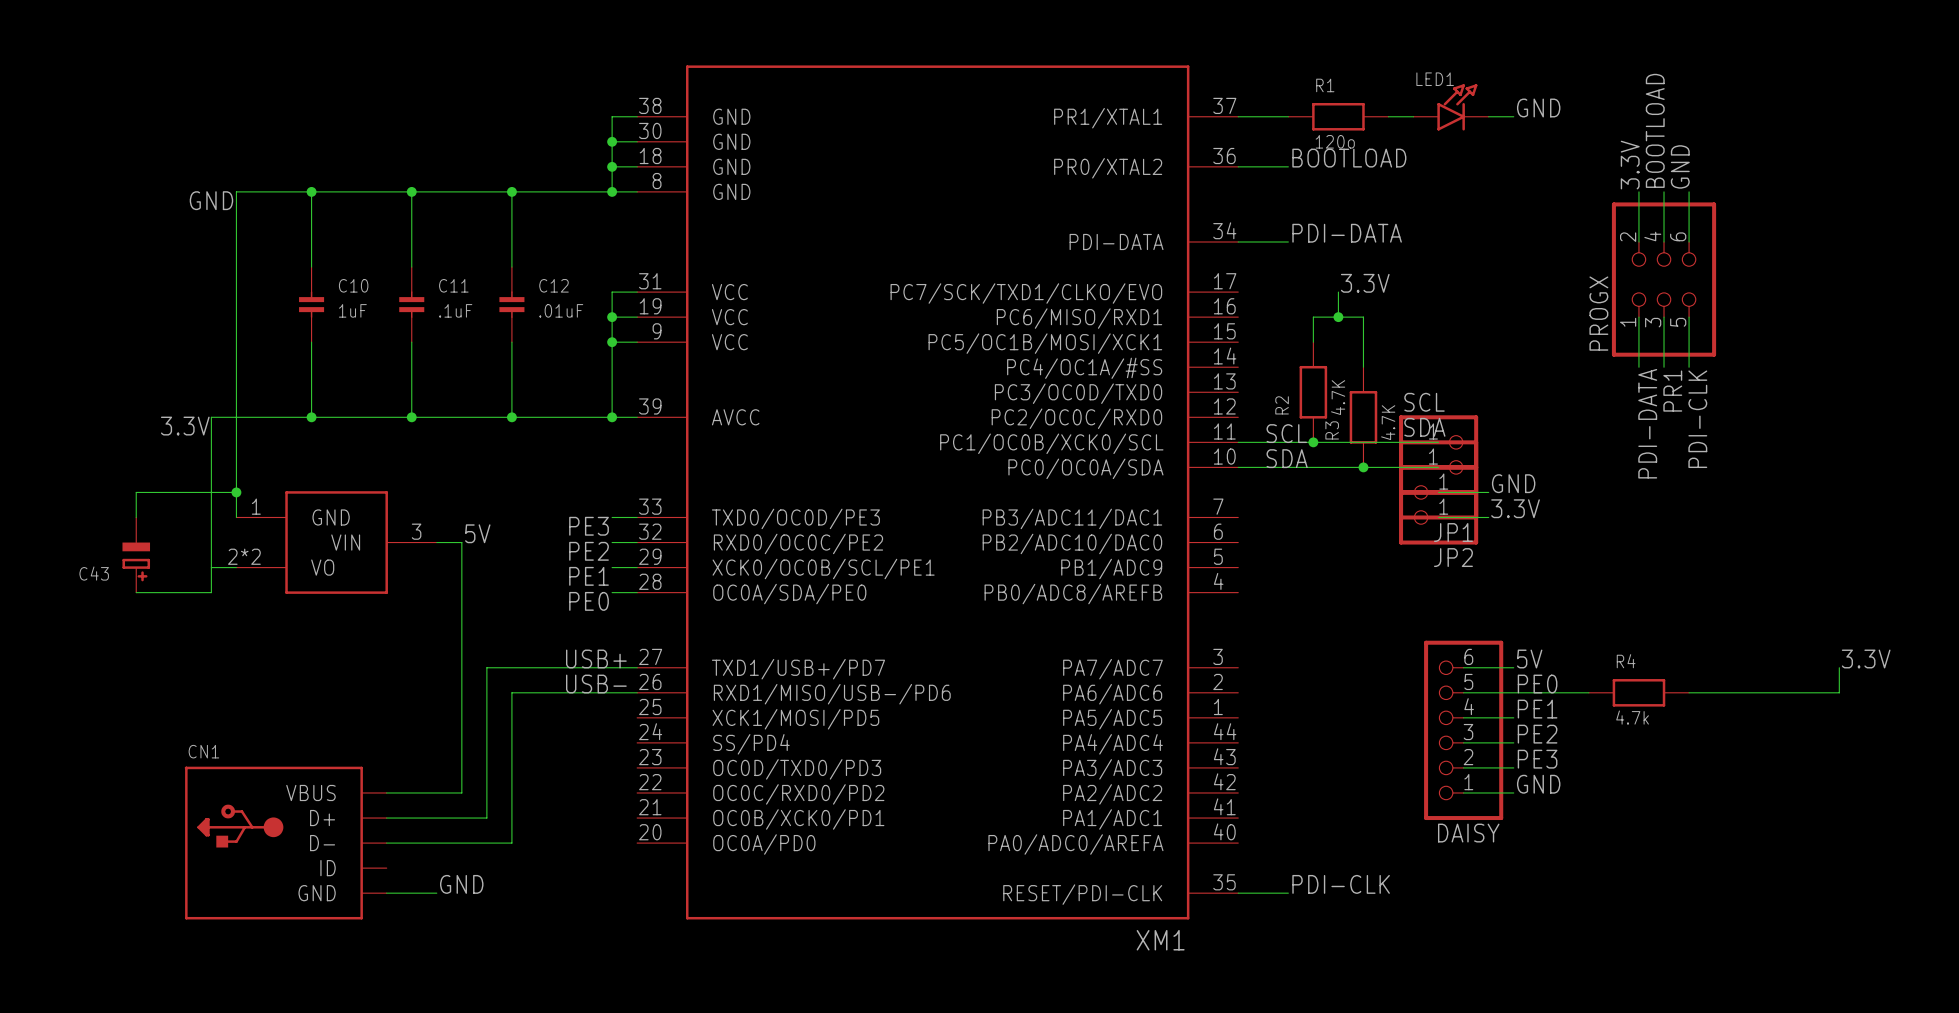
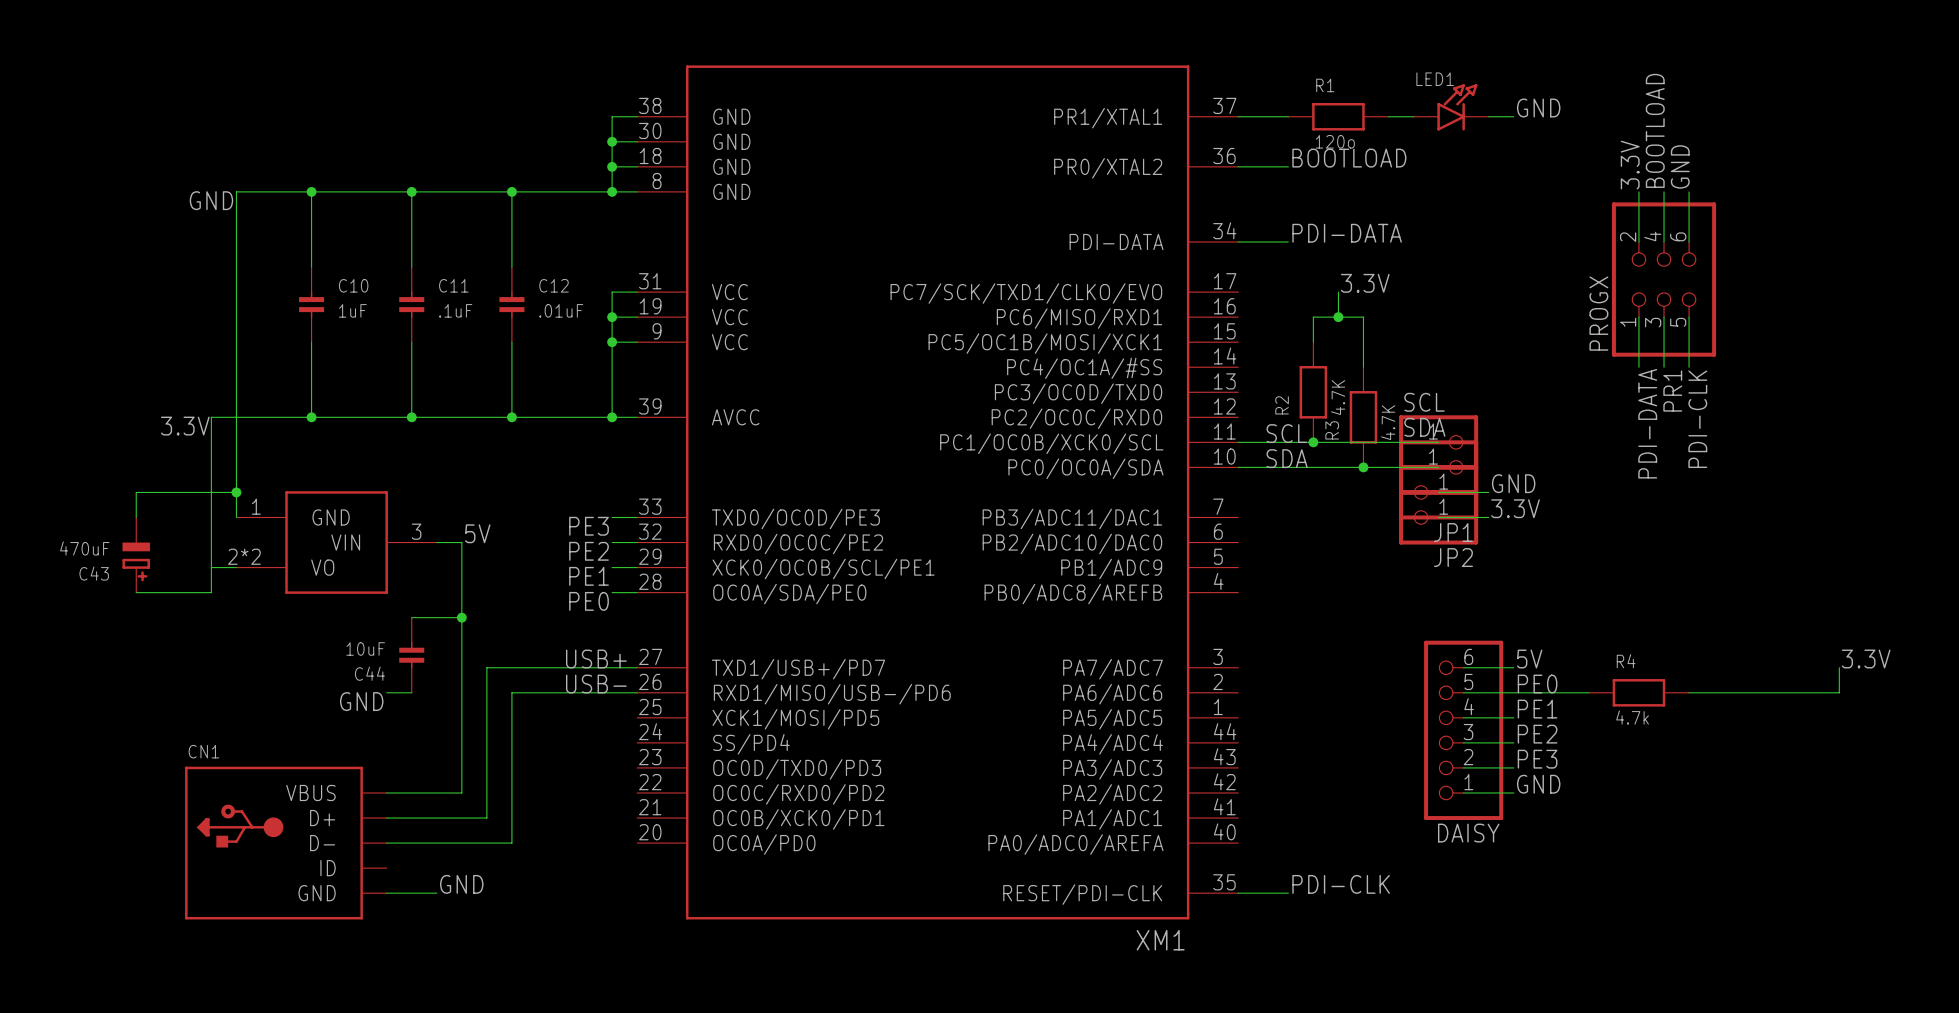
C43 value: none -> 470uF (84, 548)
wire: none -> (411, 617) (461, 617)
junction: none -> (461, 617)
C44: none -> 10uF (411, 655)
wire: none -> (386, 692) (411, 692)
label: none -> GND (361, 701)

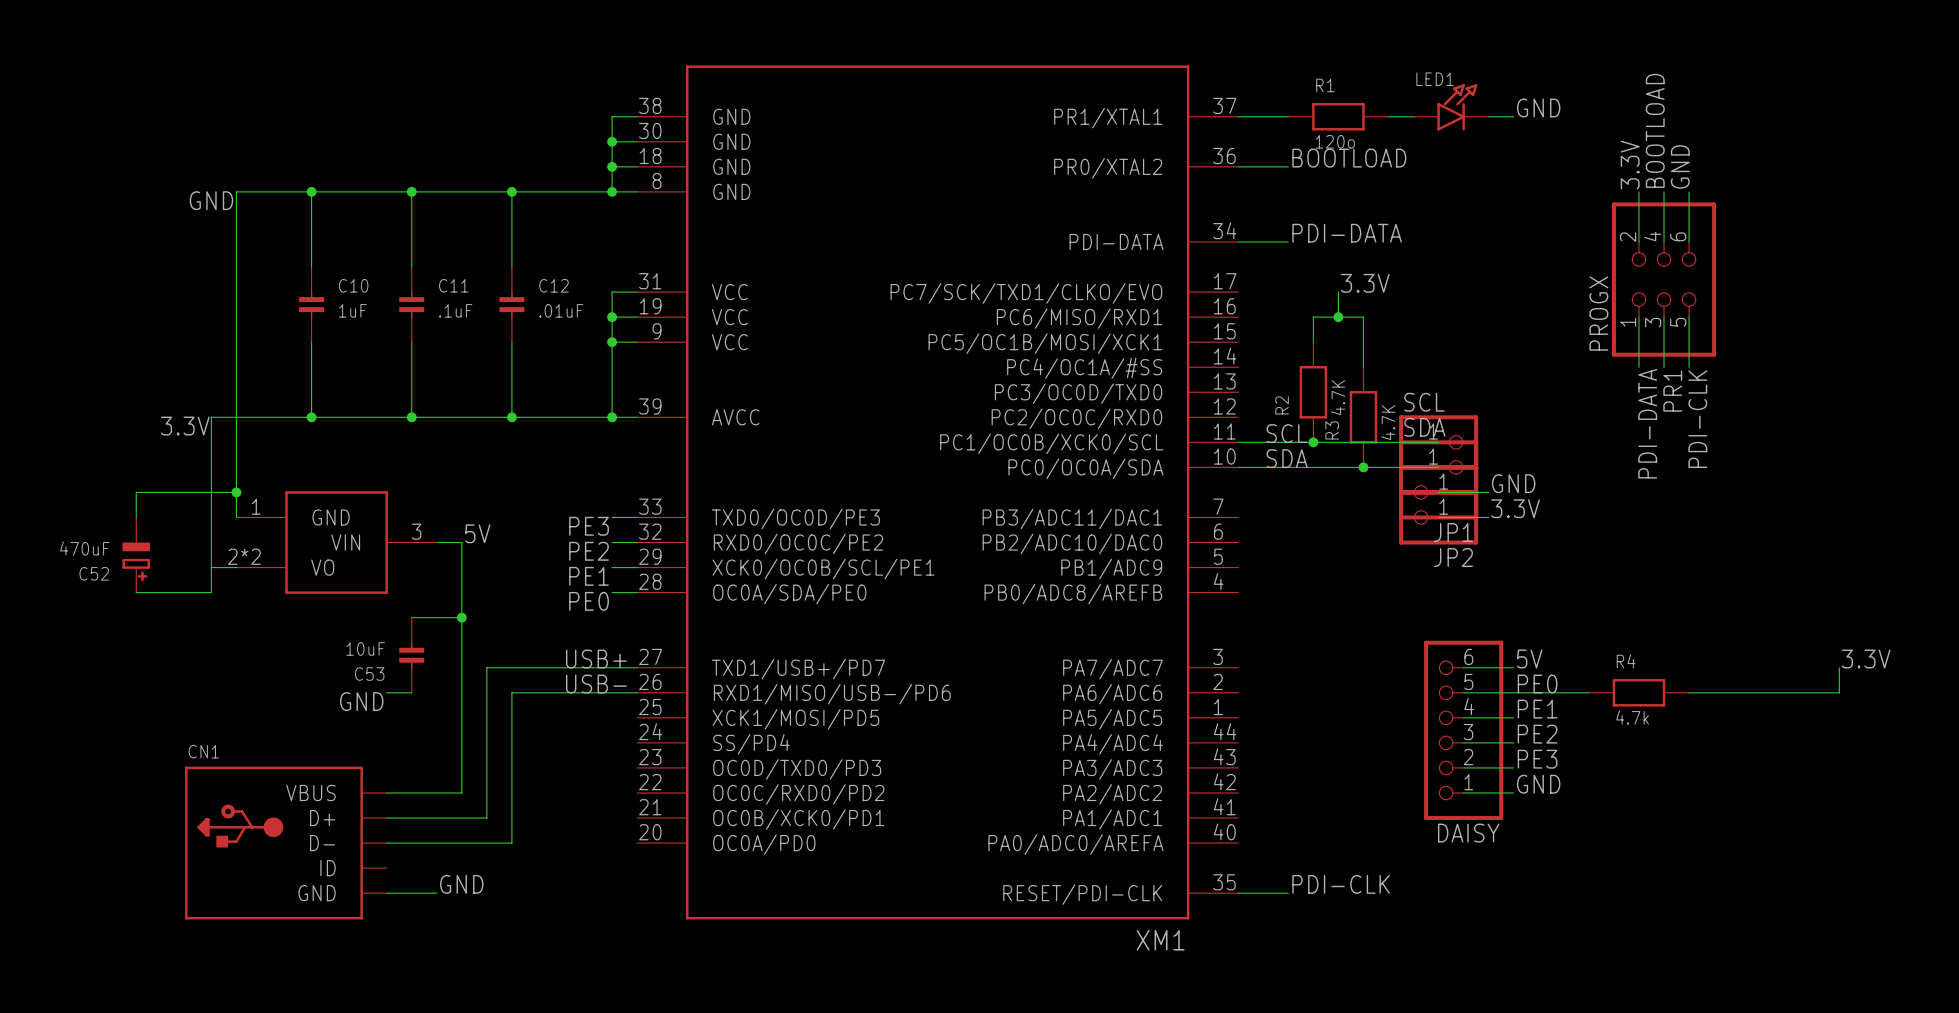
C43 name: C43 (94, 573) -> C52 (94, 573)
C44 name: C44 (369, 673) -> C53 (369, 674)

